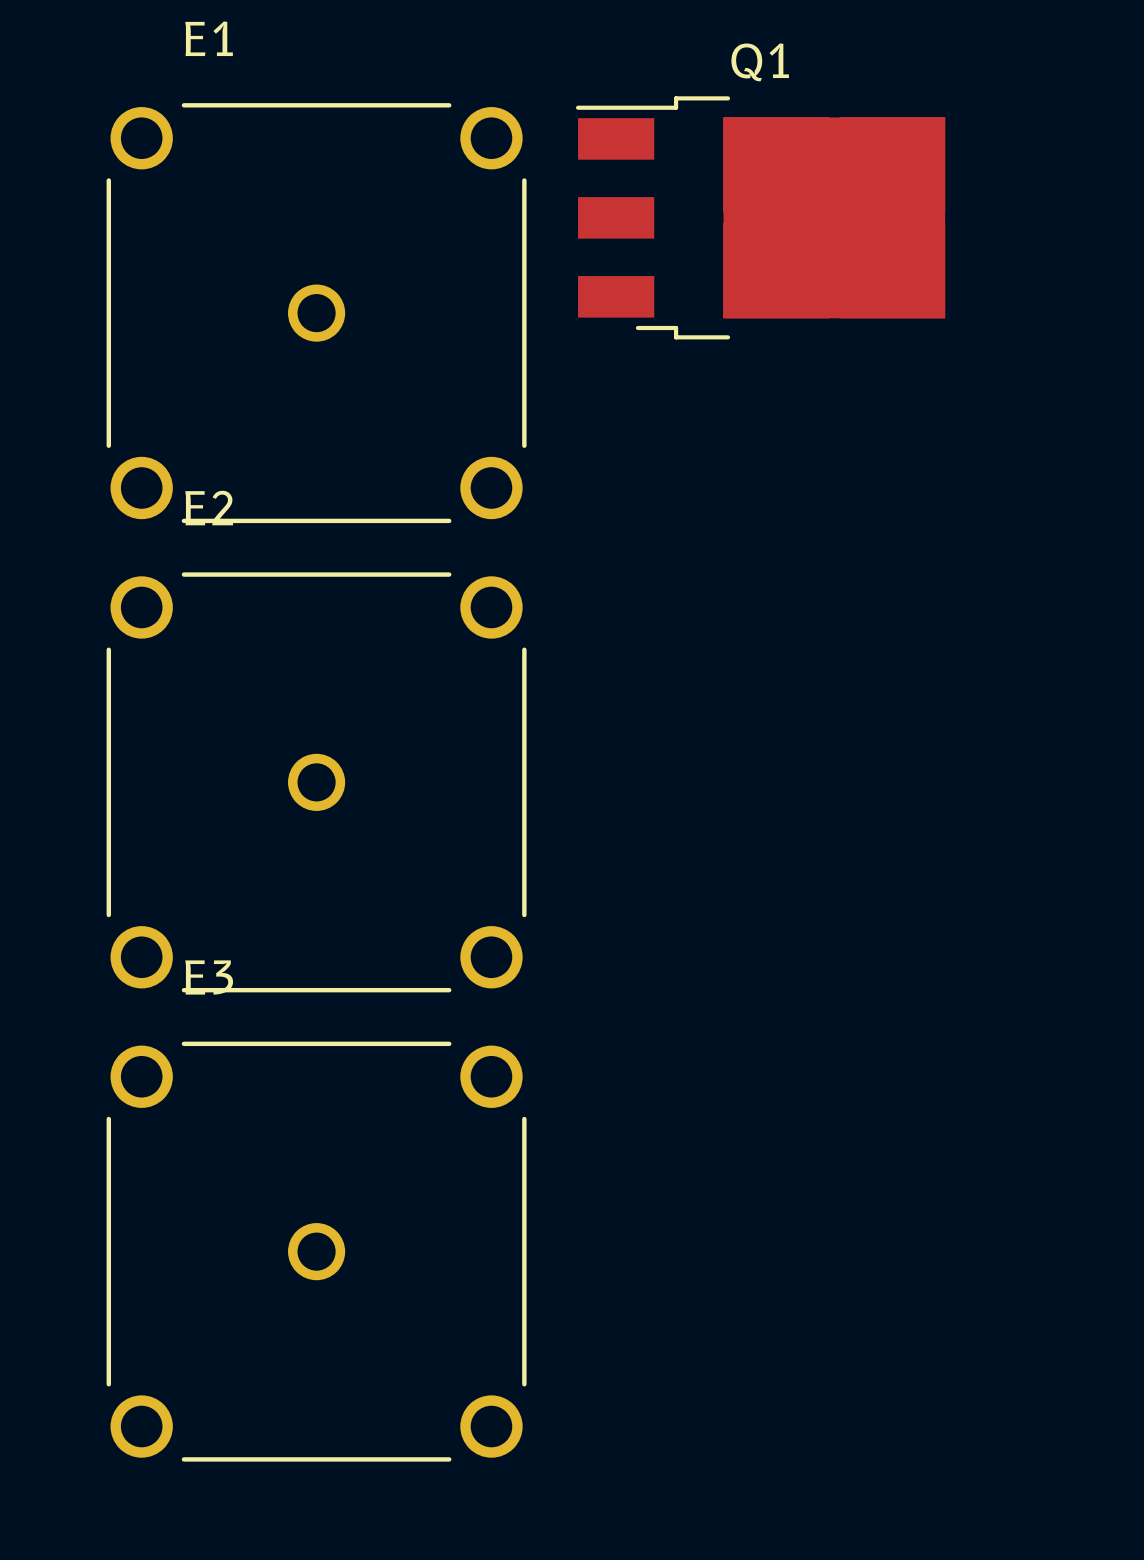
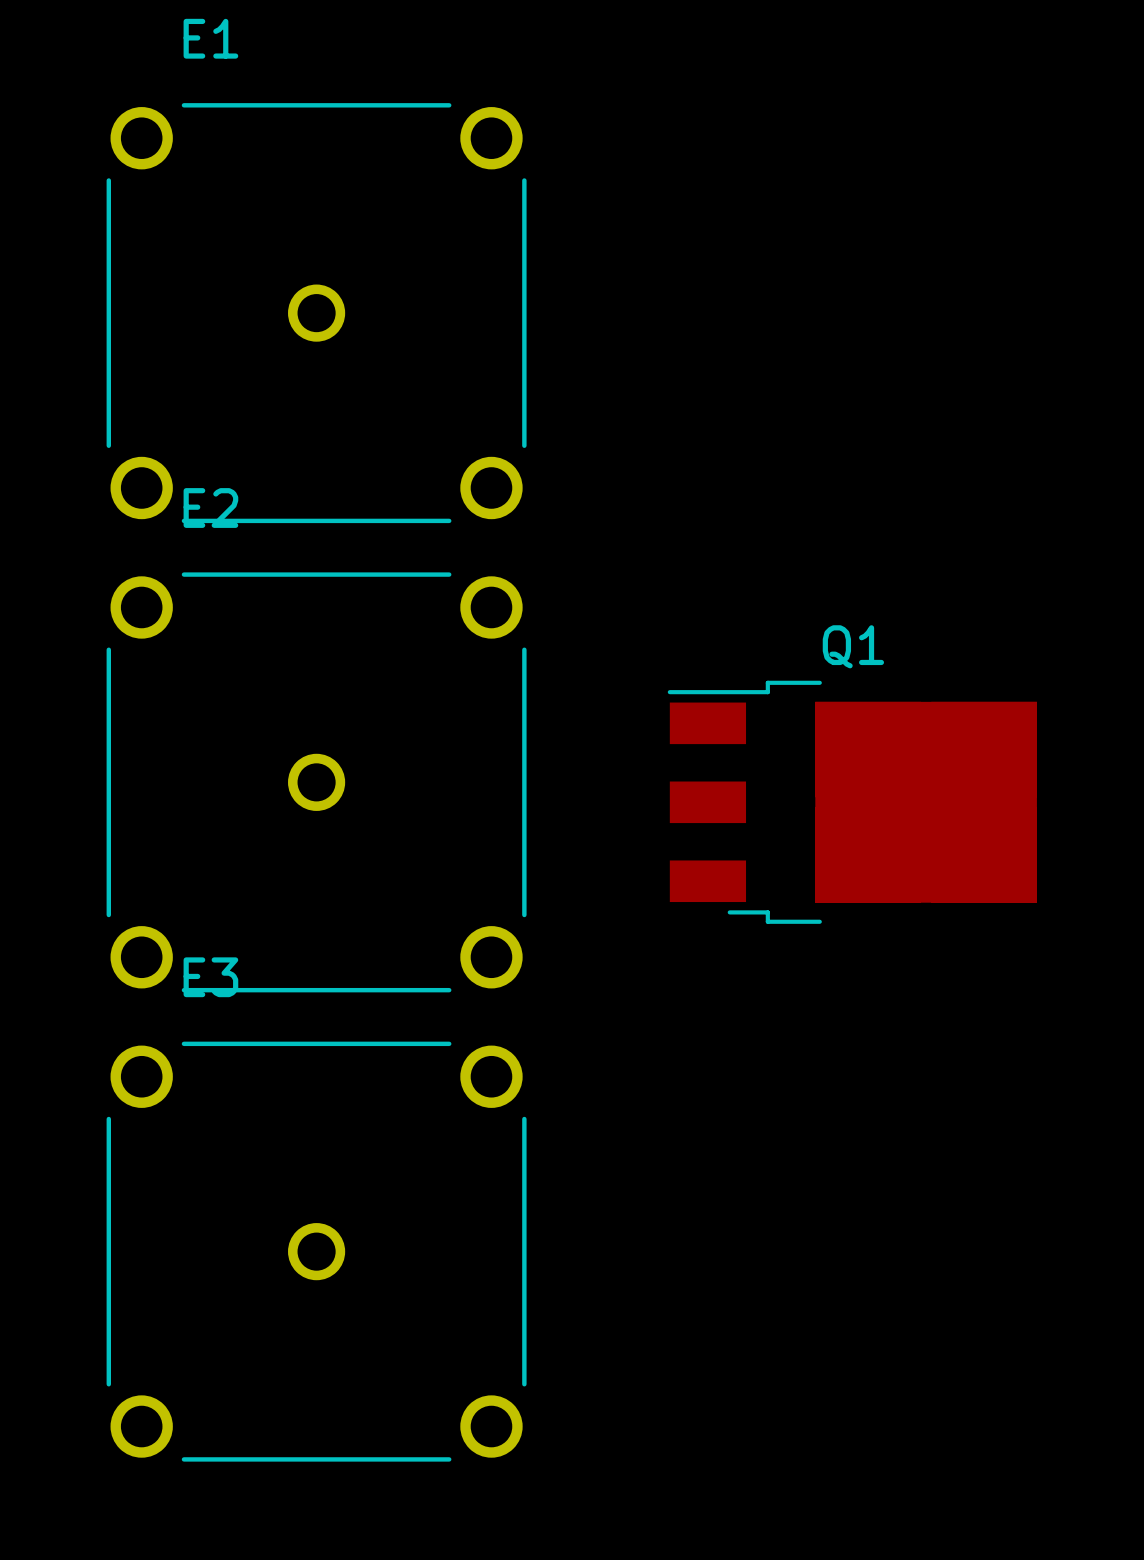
Q1 position: (760, 217) -> (852, 802)

